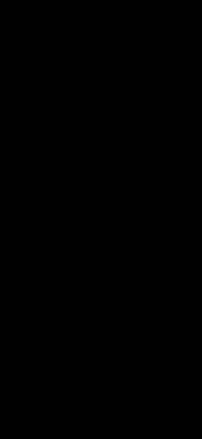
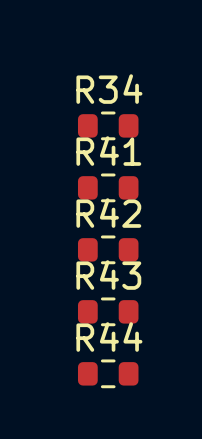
R34: none -> (108, 125)
R41: none -> (108, 187)
R42: none -> (108, 249)
R43: none -> (108, 311)
R44: none -> (108, 373)

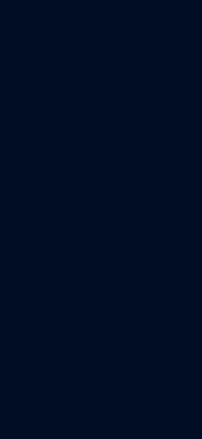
R34: (108, 125) -> none
R41: (108, 187) -> none
R42: (108, 249) -> none
R43: (108, 311) -> none
R44: (108, 373) -> none

